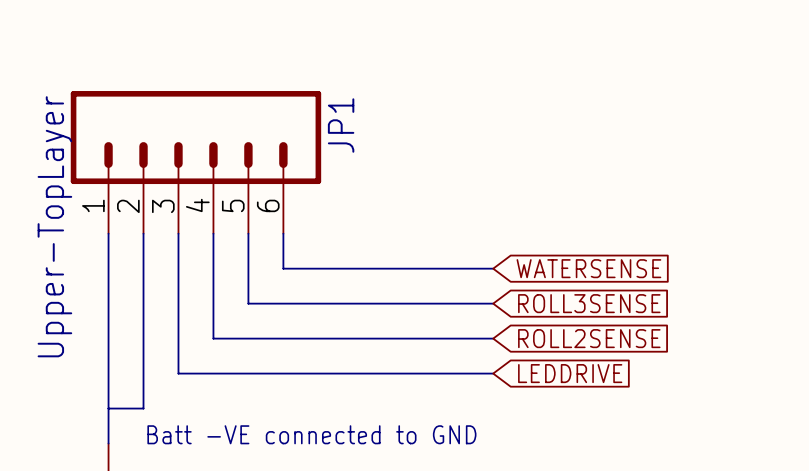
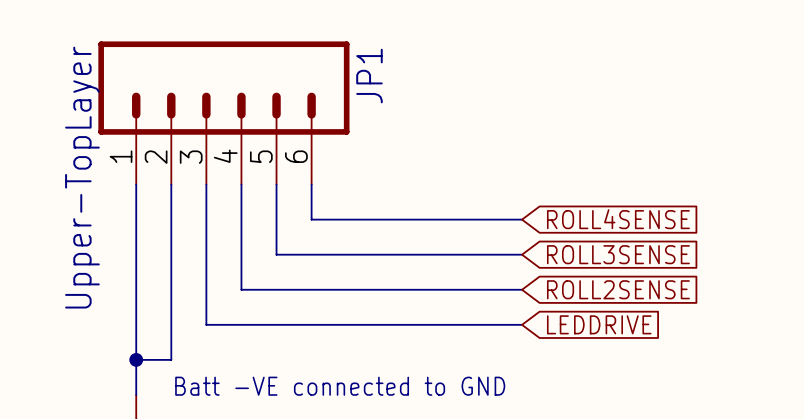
global label: WATERSENSE (588, 268) -> ROLL4SENSE (618, 219)
junction: none -> (136, 359)

